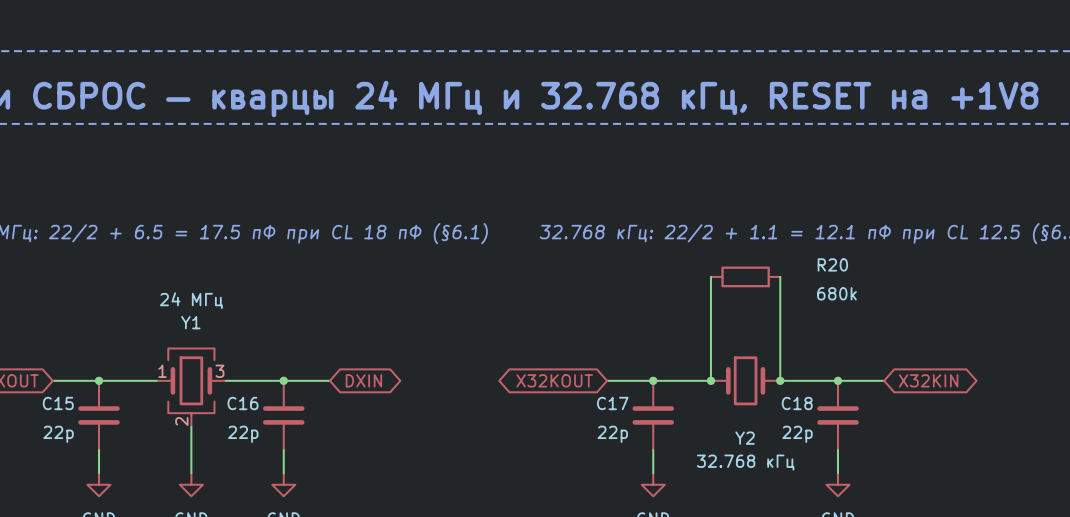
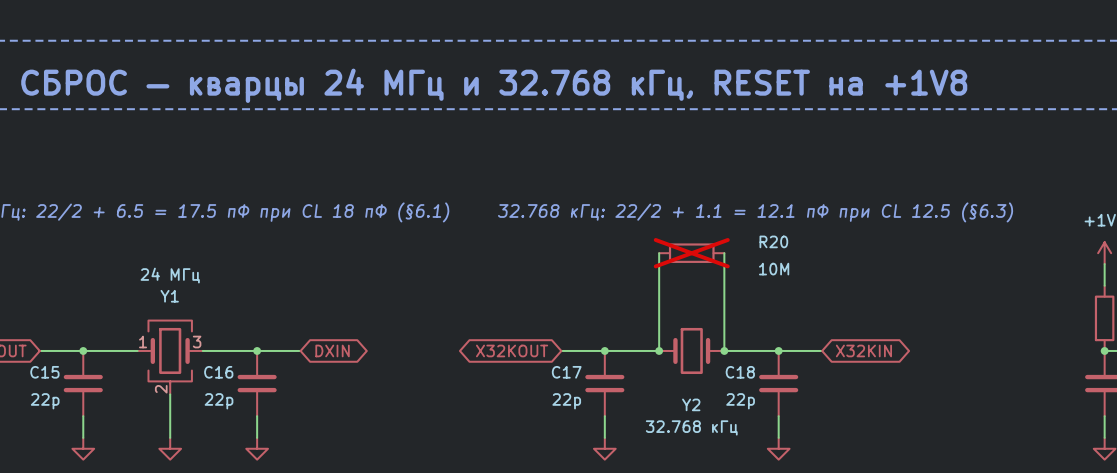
R20 do-not-place cross: none -> (691, 253)
R20 value: 680k (836, 293) -> 10M (774, 269)

